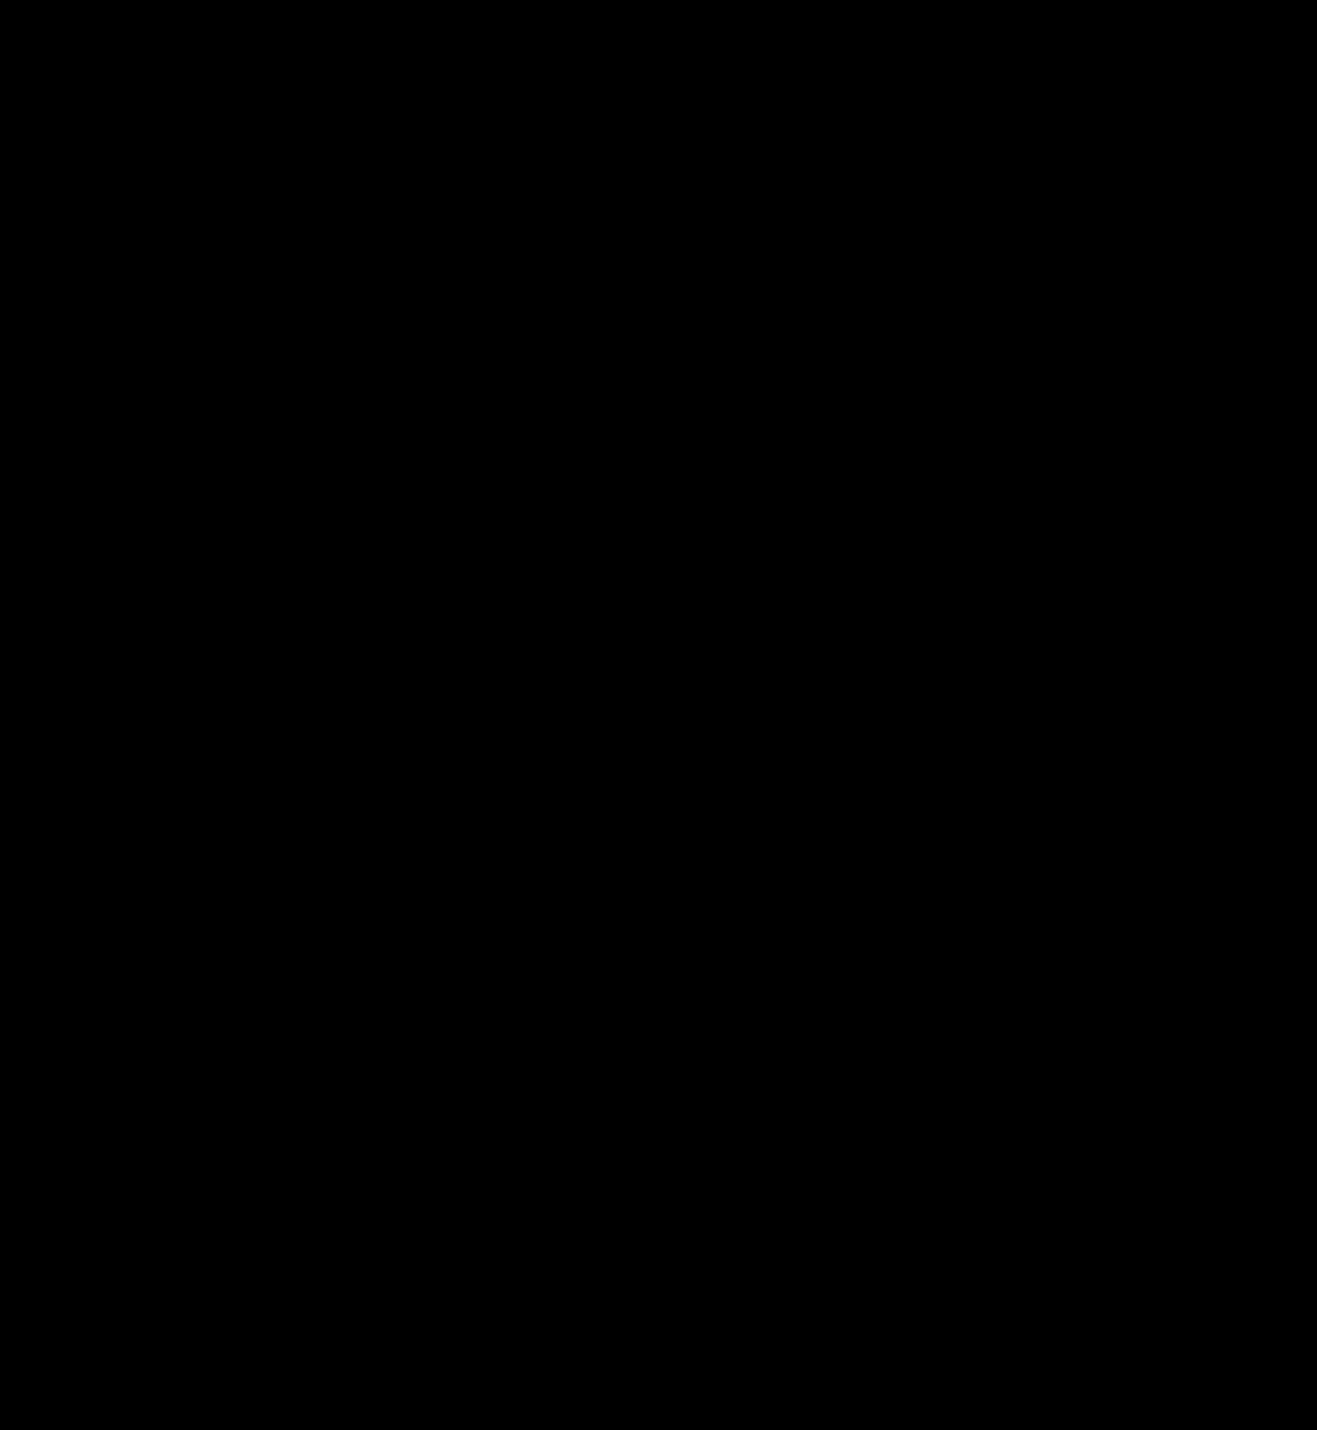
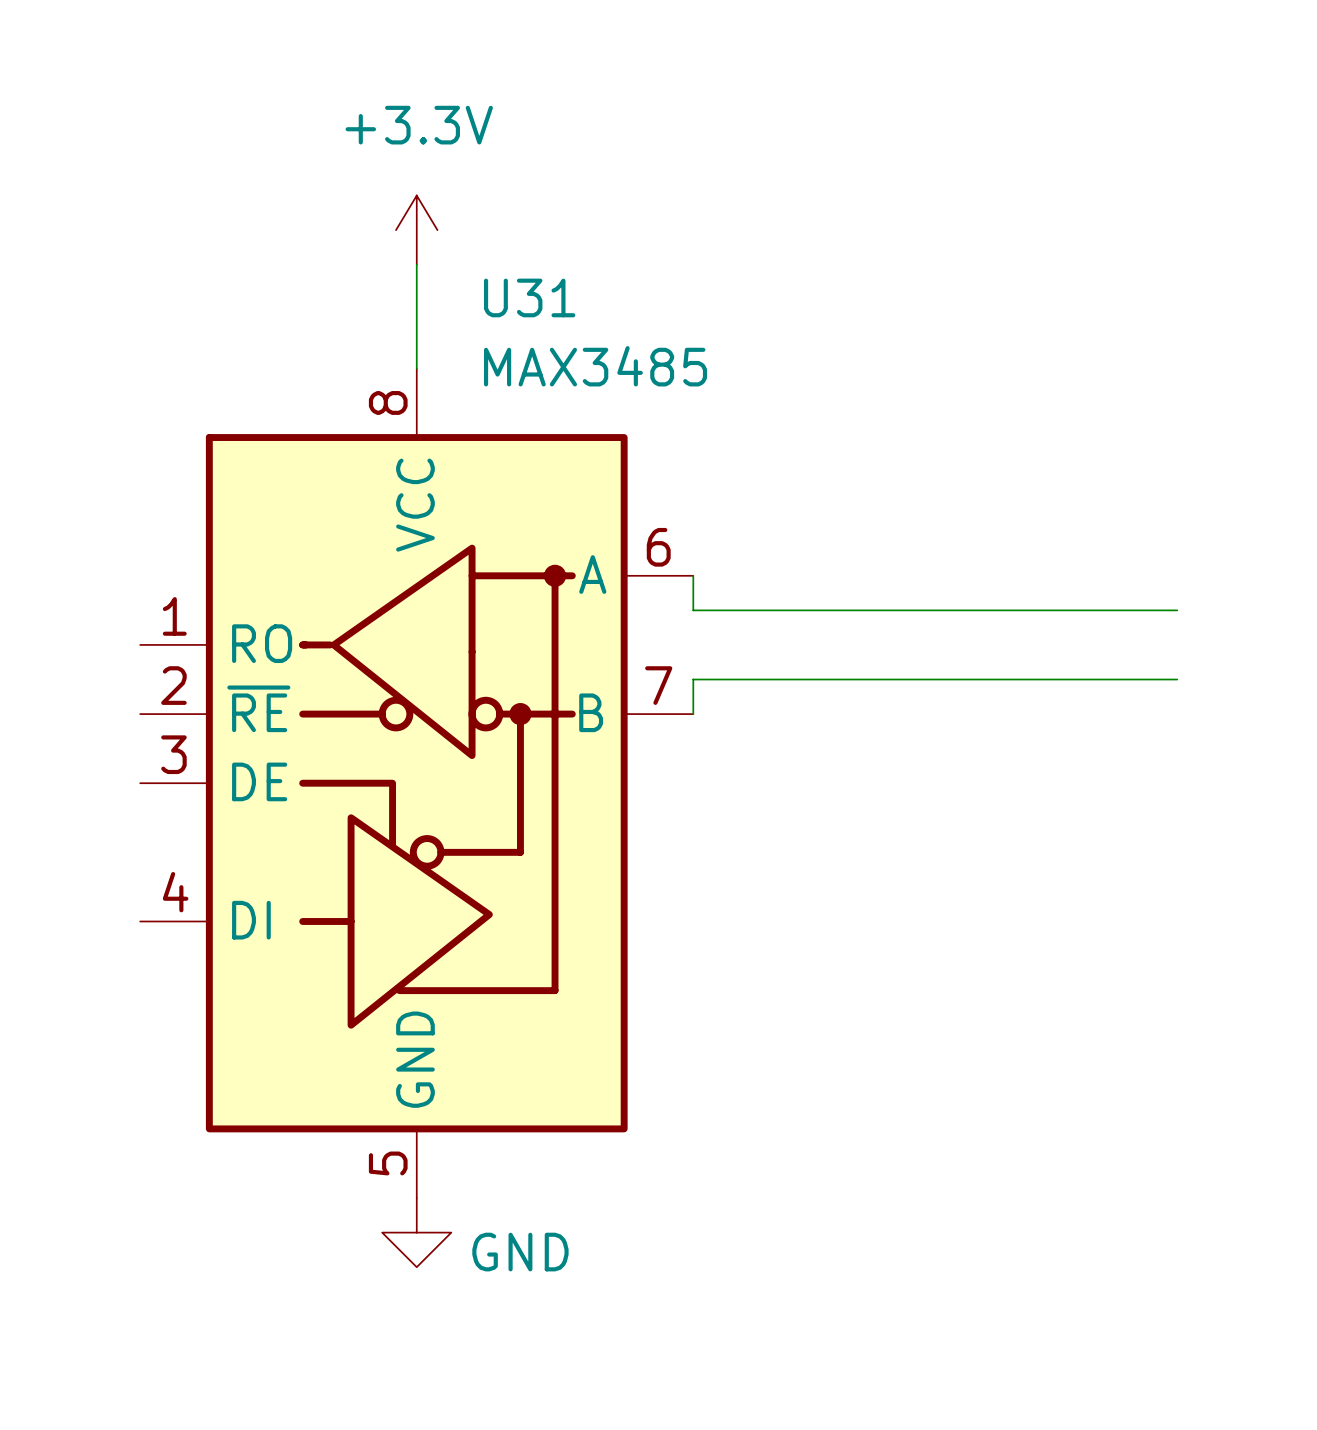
power symbol: none -> +3.3V (416, 230)
wire: none -> (416, 264) (416, 368)
wire: none -> (693, 575) (693, 610) (1177, 610)
wire: none -> (1177, 679) (693, 679) (693, 714)
U31: none -> MAX3485 (416, 783)
power symbol: none -> GND (416, 1232)

